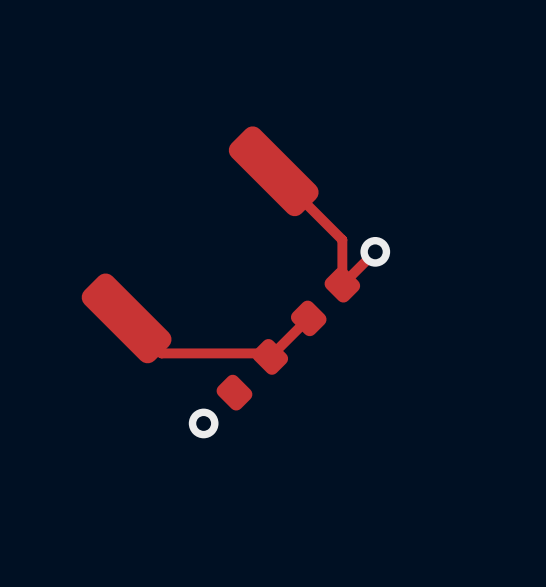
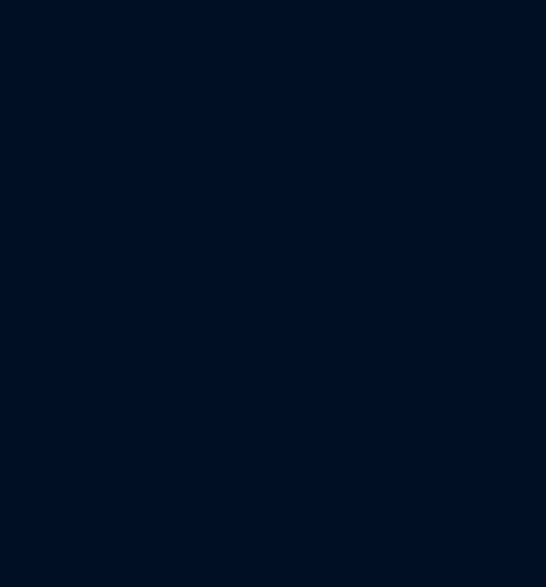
top track: (273, 171) (342, 239) (342, 284) (375, 251) -> none
part: (200, 244) -> none
via: (375, 251) -> none
part: (325, 301) -> none
top track: (308, 318) (270, 356) (266, 353) (161, 353) (126, 318) -> none
part: (252, 374) -> none
via: (203, 423) -> none

